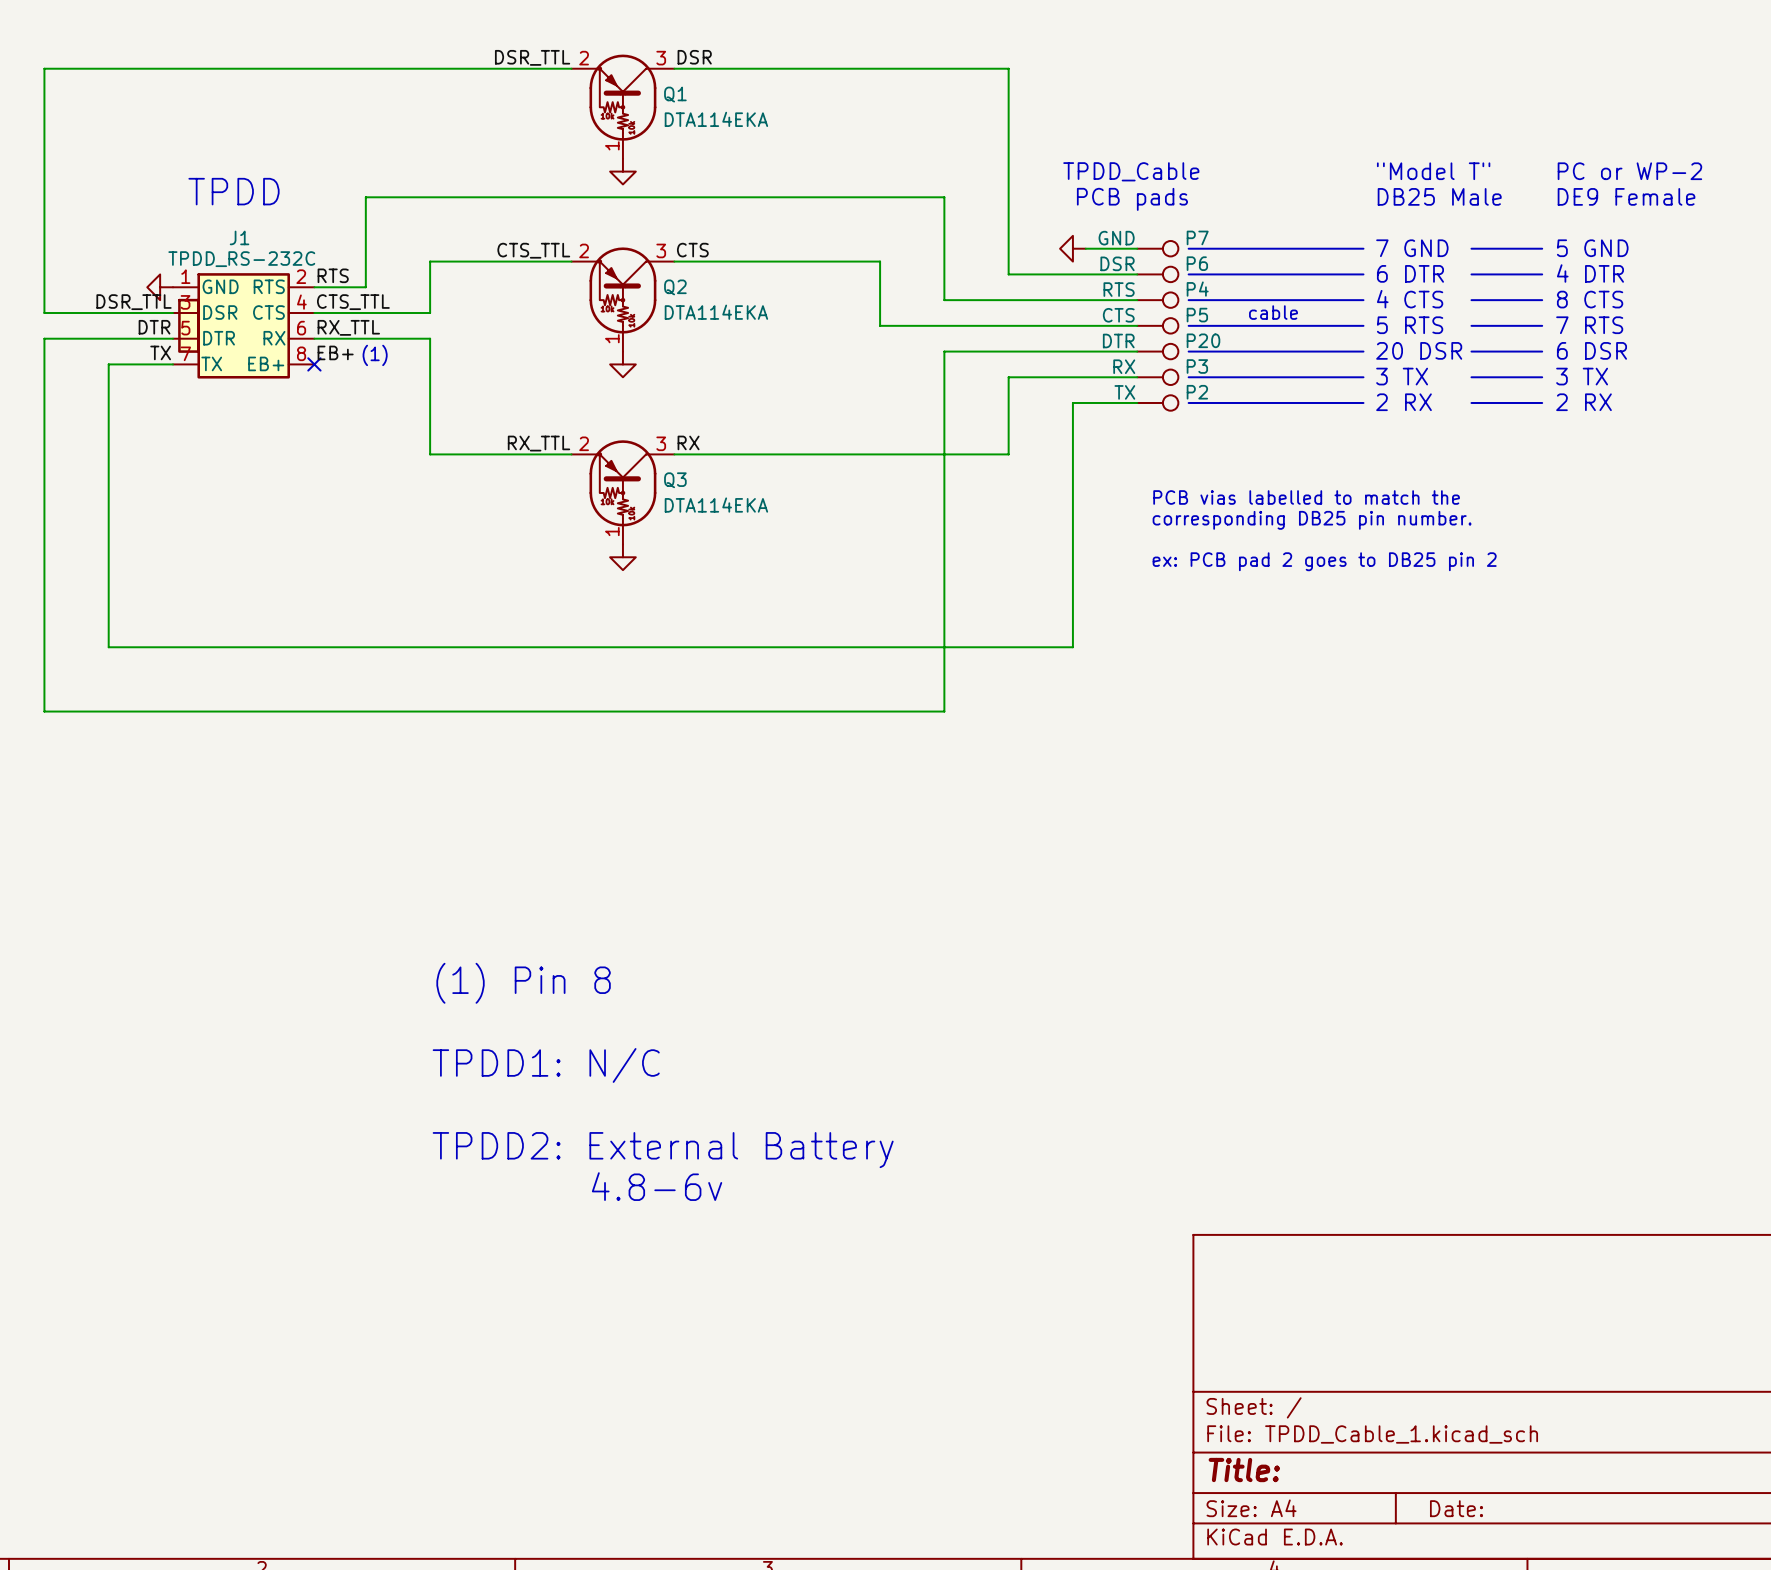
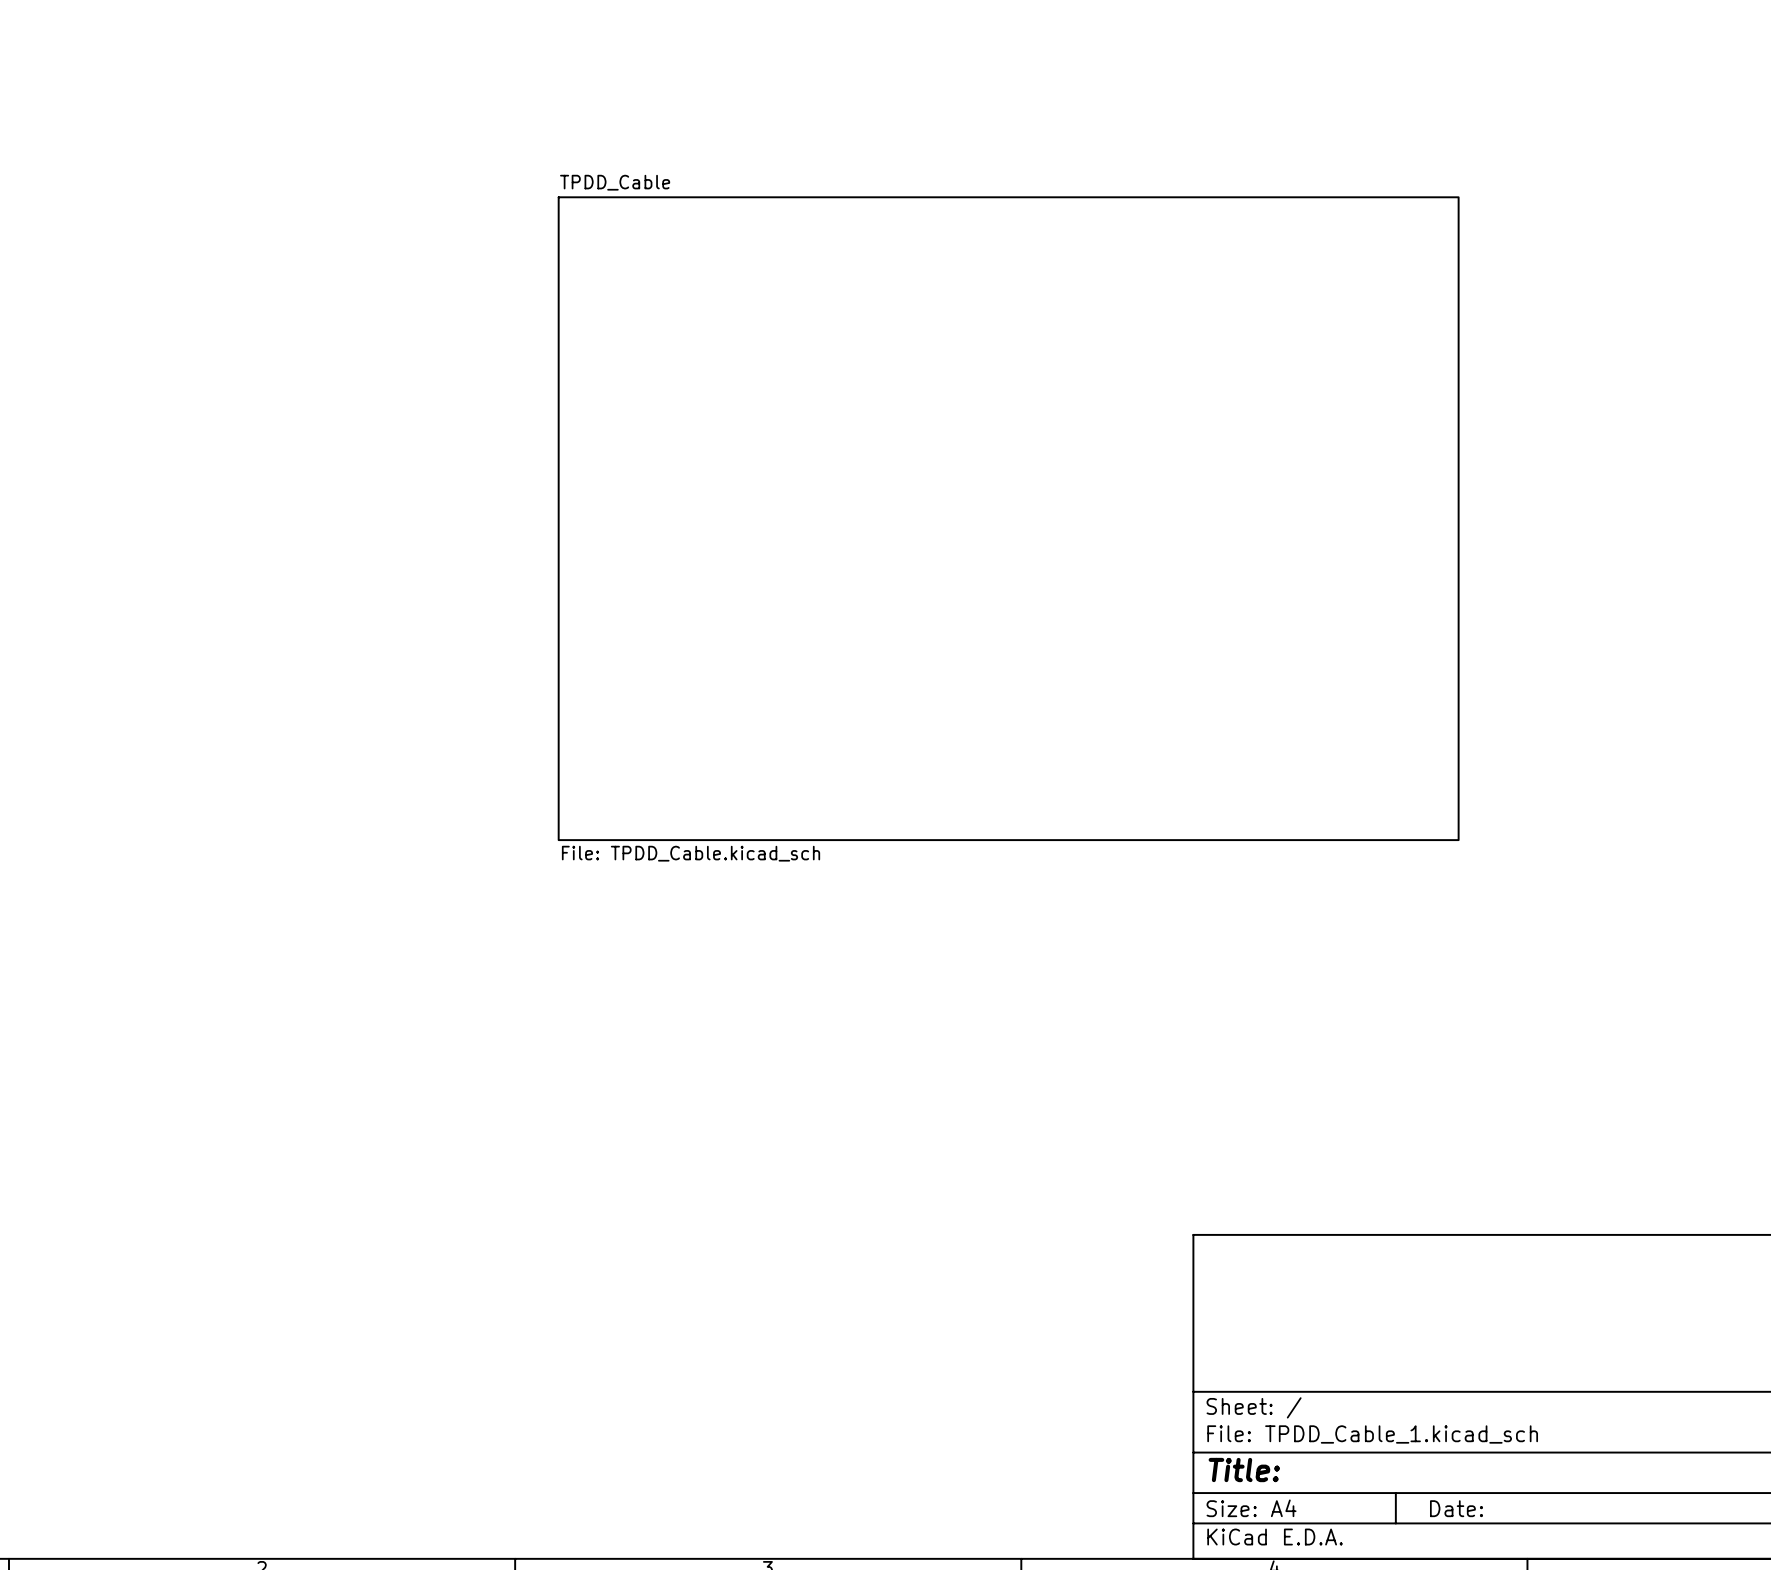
label: DSR_TTL (532, 57) -> none
label: DSR (694, 57) -> none
wire: (571, 68) (44, 68) (44, 312) (172, 312) -> none
wire: (674, 68) (1008, 68) (1008, 274) (1137, 274) -> none
Q1: DTA114EKA (622, 106) -> none
power symbol: (622, 171) -> none
text: TPDD_Cable (1131, 171) -> none
text: "Model T" (1433, 171) -> none
text: PC or WP-2 (1629, 171) -> none
text: TPDD (234, 191) -> none
text: DB25 Male (1439, 196) -> none
text: DE9 Female (1626, 196) -> none
text: PCB pads (1132, 199) -> none
power symbol: (1072, 248) -> none
wire: (1085, 248) (1137, 248) -> none
P7: GND (1157, 248) -> none
line: (1188, 248) (1363, 248) -> none
text: 7 GND (1412, 248) -> none
line: (1471, 248) (1542, 248) -> none
text: 5 GND (1592, 248) -> none
label: CTS_TTL (533, 250) -> none
label: CTS (692, 250) -> none
wire: (571, 261) (430, 261) (430, 312) (314, 312) -> none
wire: (674, 261) (880, 261) (880, 325) (1137, 325) -> none
text: 6 DTR (1410, 273) -> none
text: 4 DTR (1590, 273) -> none
P6: DSR (1157, 274) -> none
line: (1188, 274) (1363, 274) -> none
line: (1471, 274) (1542, 274) -> none
label: RTS (333, 275) -> none
power symbol: (160, 287) -> none
wire: (314, 287) (365, 287) (365, 197) (944, 197) (944, 300) (1137, 300) -> none
Q2: DTA114EKA (622, 299) -> none
text: 4 CTS (1410, 299) -> none
text: 8 CTS (1590, 299) -> none
P4: RTS (1157, 300) -> none
line: (1188, 300) (1363, 300) -> none
line: (1471, 300) (1542, 300) -> none
label: DSR_TTL (134, 302) -> none
label: CTS_TTL (353, 302) -> none
text: cable (1273, 312) -> none
J1: TPDD_RS-232C (243, 325) -> none
P5: CTS (1157, 325) -> none
line: (1188, 325) (1363, 325) -> none
text: 5 RTS (1410, 325) -> none
line: (1471, 325) (1542, 325) -> none
text: 7 RTS (1589, 325) -> none
label: DTR (154, 327) -> none
label: RX_TTL (348, 327) -> none
wire: (172, 338) (44, 338) (44, 711) (944, 711) (944, 351) (1137, 351) -> none
wire: (314, 338) (430, 338) (430, 454) (571, 454) -> none
text: 20 DSR (1419, 350) -> none
text: 6 DSR (1591, 350) -> none
P20: DTR (1157, 351) -> none
line: (1188, 351) (1363, 351) -> none
line: (1471, 351) (1542, 351) -> none
label: TX (160, 352) -> none
label: EB+ (335, 352) -> none
text: (1) (375, 355) -> none
wire: (172, 364) (108, 364) (108, 647) (1072, 647) (1072, 402) (1137, 402) -> none
no-connect mark: (314, 364) -> none
power symbol: (622, 364) -> none
text: 3 TX (1402, 376) -> none
text: 3 TX (1582, 376) -> none
wire: (1137, 377) (1008, 377) (1008, 454) (674, 454) -> none
P3: RX (1157, 377) -> none
line: (1188, 377) (1363, 377) -> none
line: (1471, 377) (1542, 377) -> none
P2: TX (1157, 402) -> none
line: (1188, 402) (1363, 402) -> none
text: 2 RX (1404, 402) -> none
line: (1471, 402) (1542, 402) -> none
text: 2 RX (1584, 402) -> none
label: RX (688, 442) -> none
label: RX_TTL (538, 443) -> none
Q3: DTA114EKA (622, 492) -> none
text: PCB vias labelled to match the (1306, 497) -> none
sheet TPDD_Cable: none -> File: TPDD_Cable.kicad_sch (1008, 518)
text: corresponding DB25 pin number. (1312, 520) -> none
power symbol: (622, 557) -> none
text: ex: PCB pad 2 goes to DB25 pin 2 (1324, 561) -> none
text: (1) Pin 8 (523, 983) -> none
text: TPDD1: N/C (546, 1065) -> none
text: TPDD2: External Battery (663, 1150) -> none
text: 4.8-6v (657, 1186) -> none

